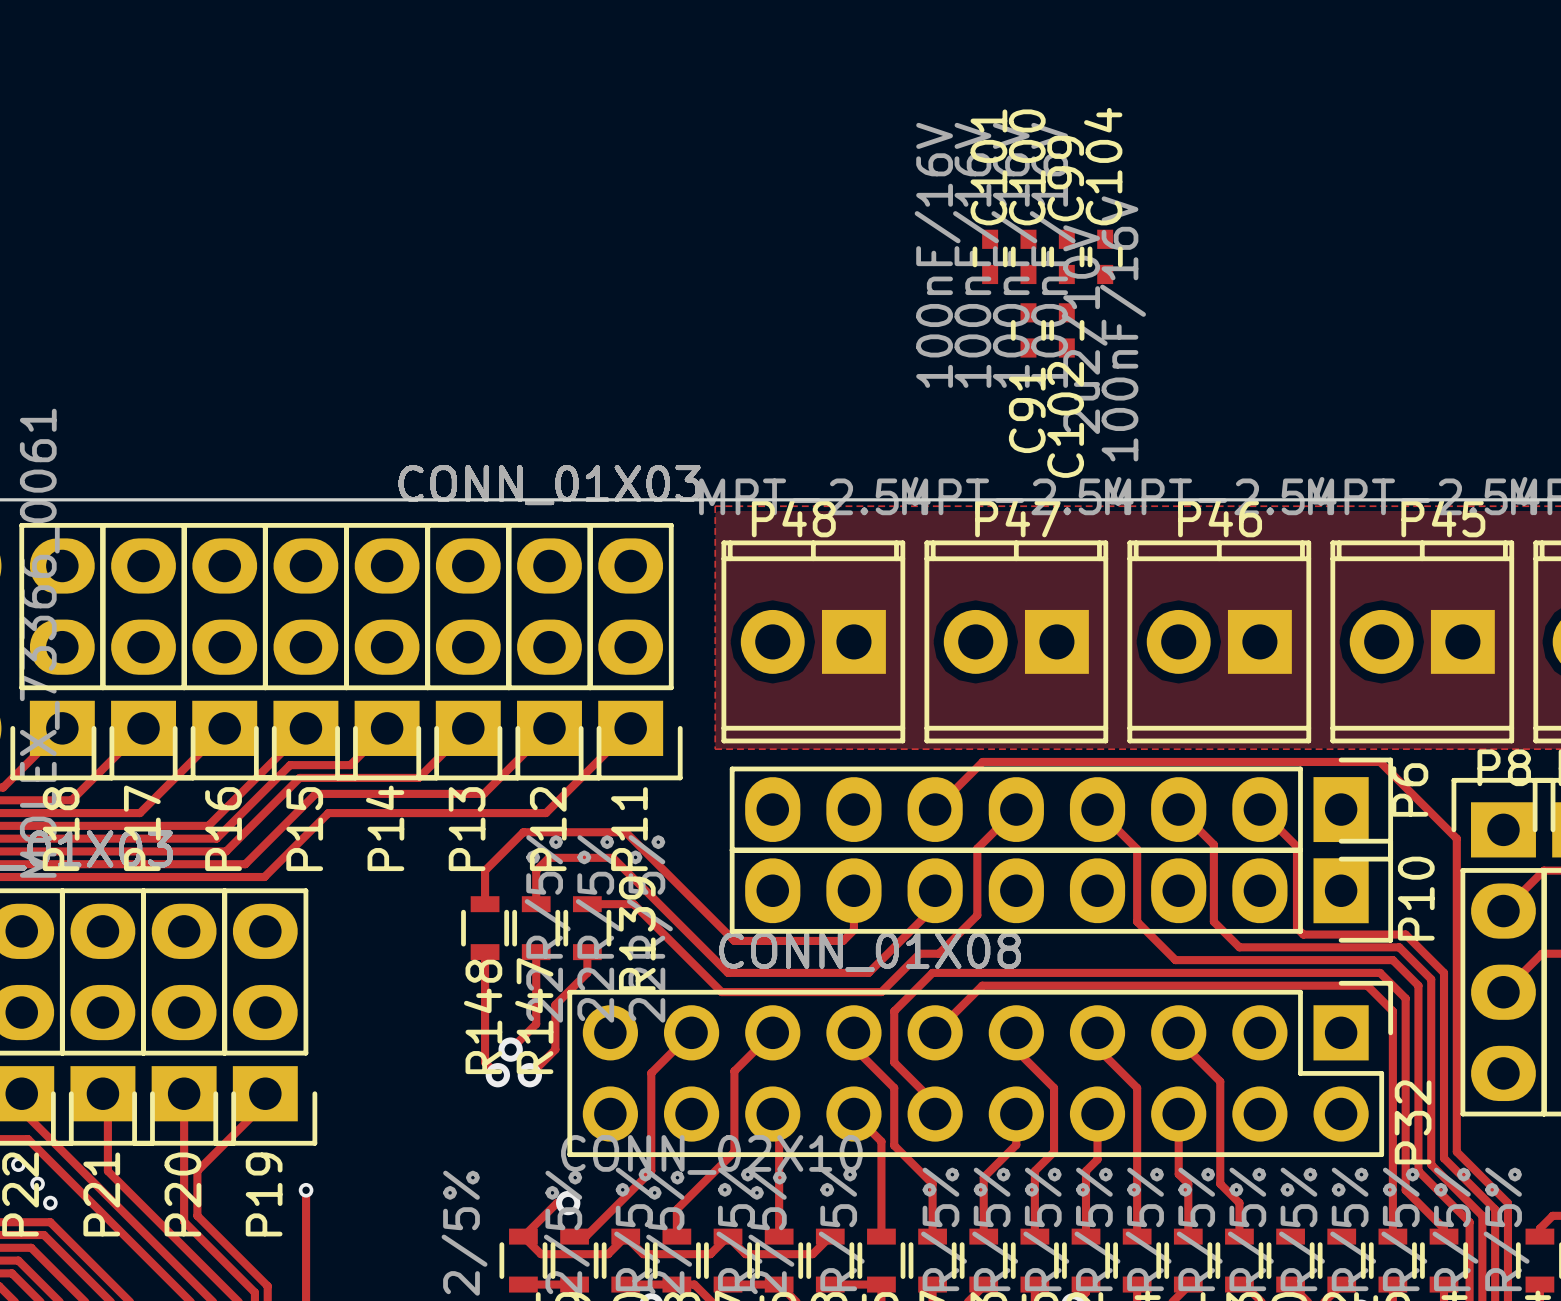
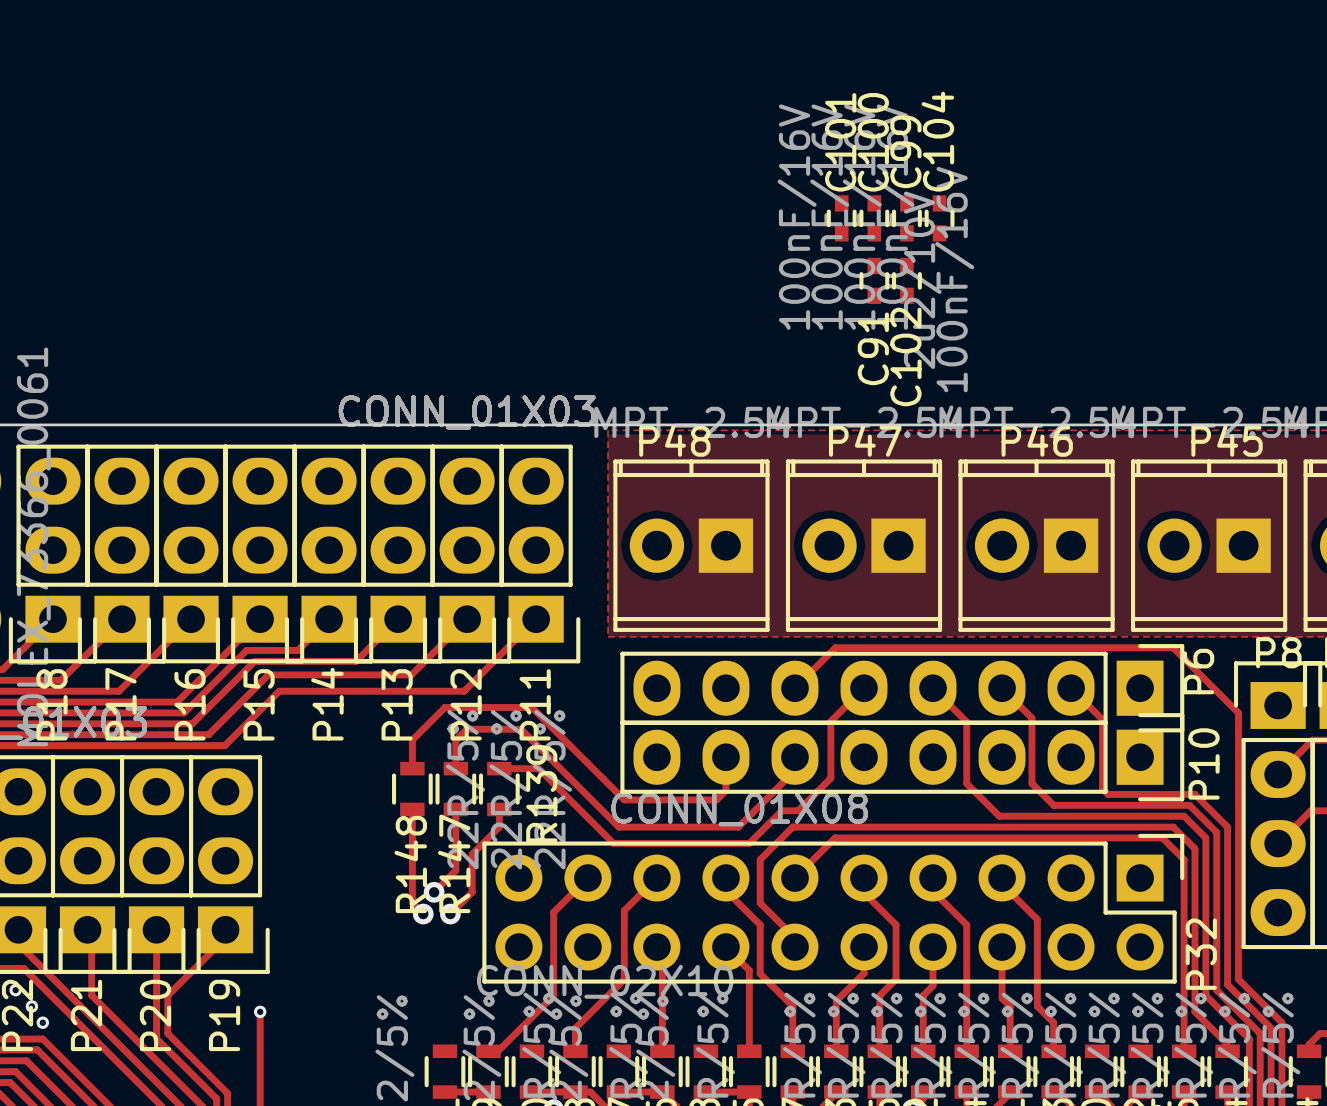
track: (568, 1203) (557, 1203) (523, 1236) (541, 1254) (608, 1254) (625, 1236) (643, 1254) (710, 1254) (728, 1236) (745, 1254) (812, 1254) (830, 1236) -> none
via: (568, 1203) -> none

